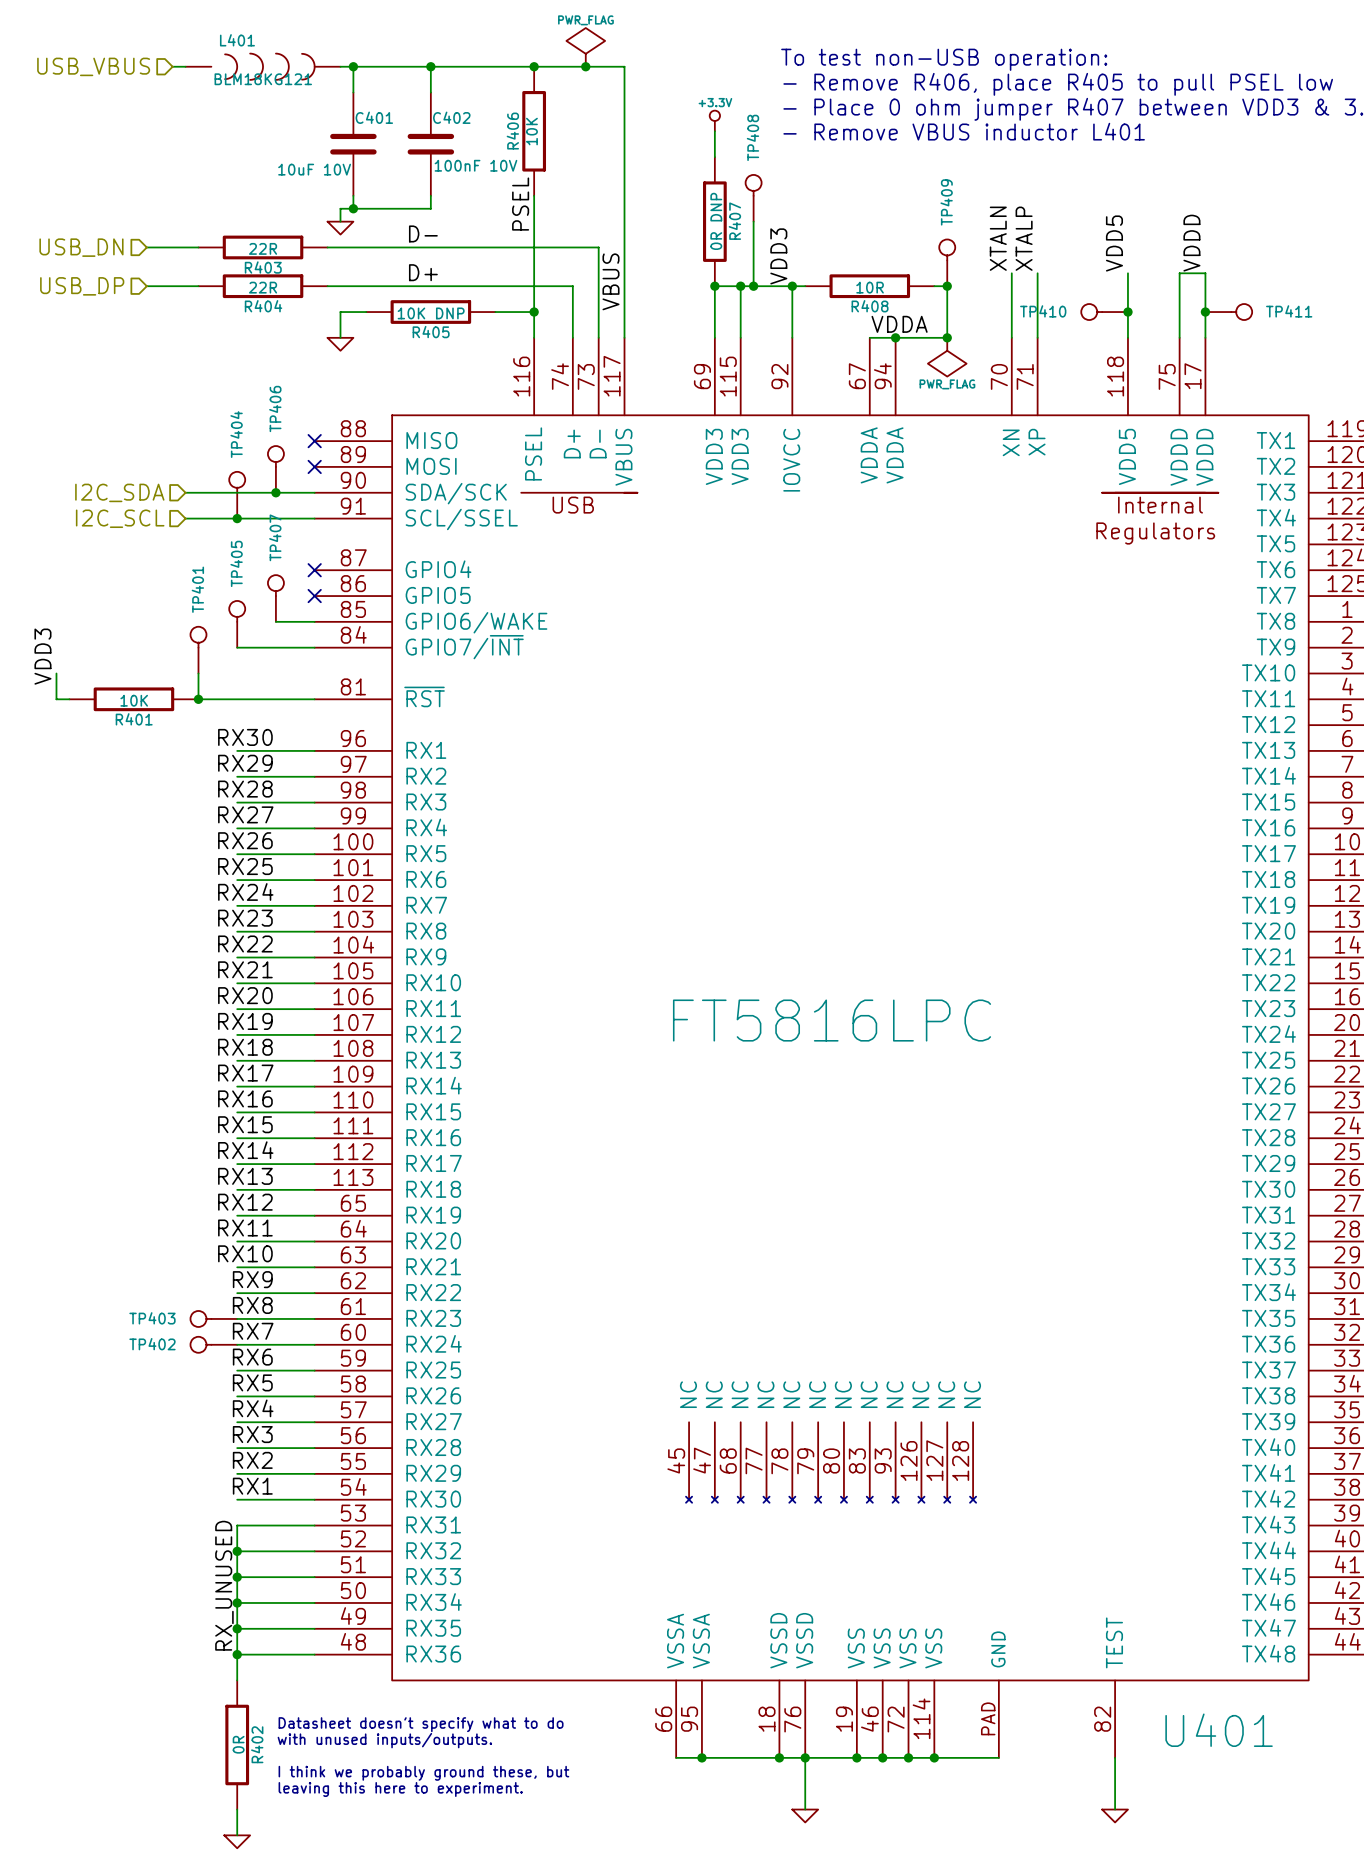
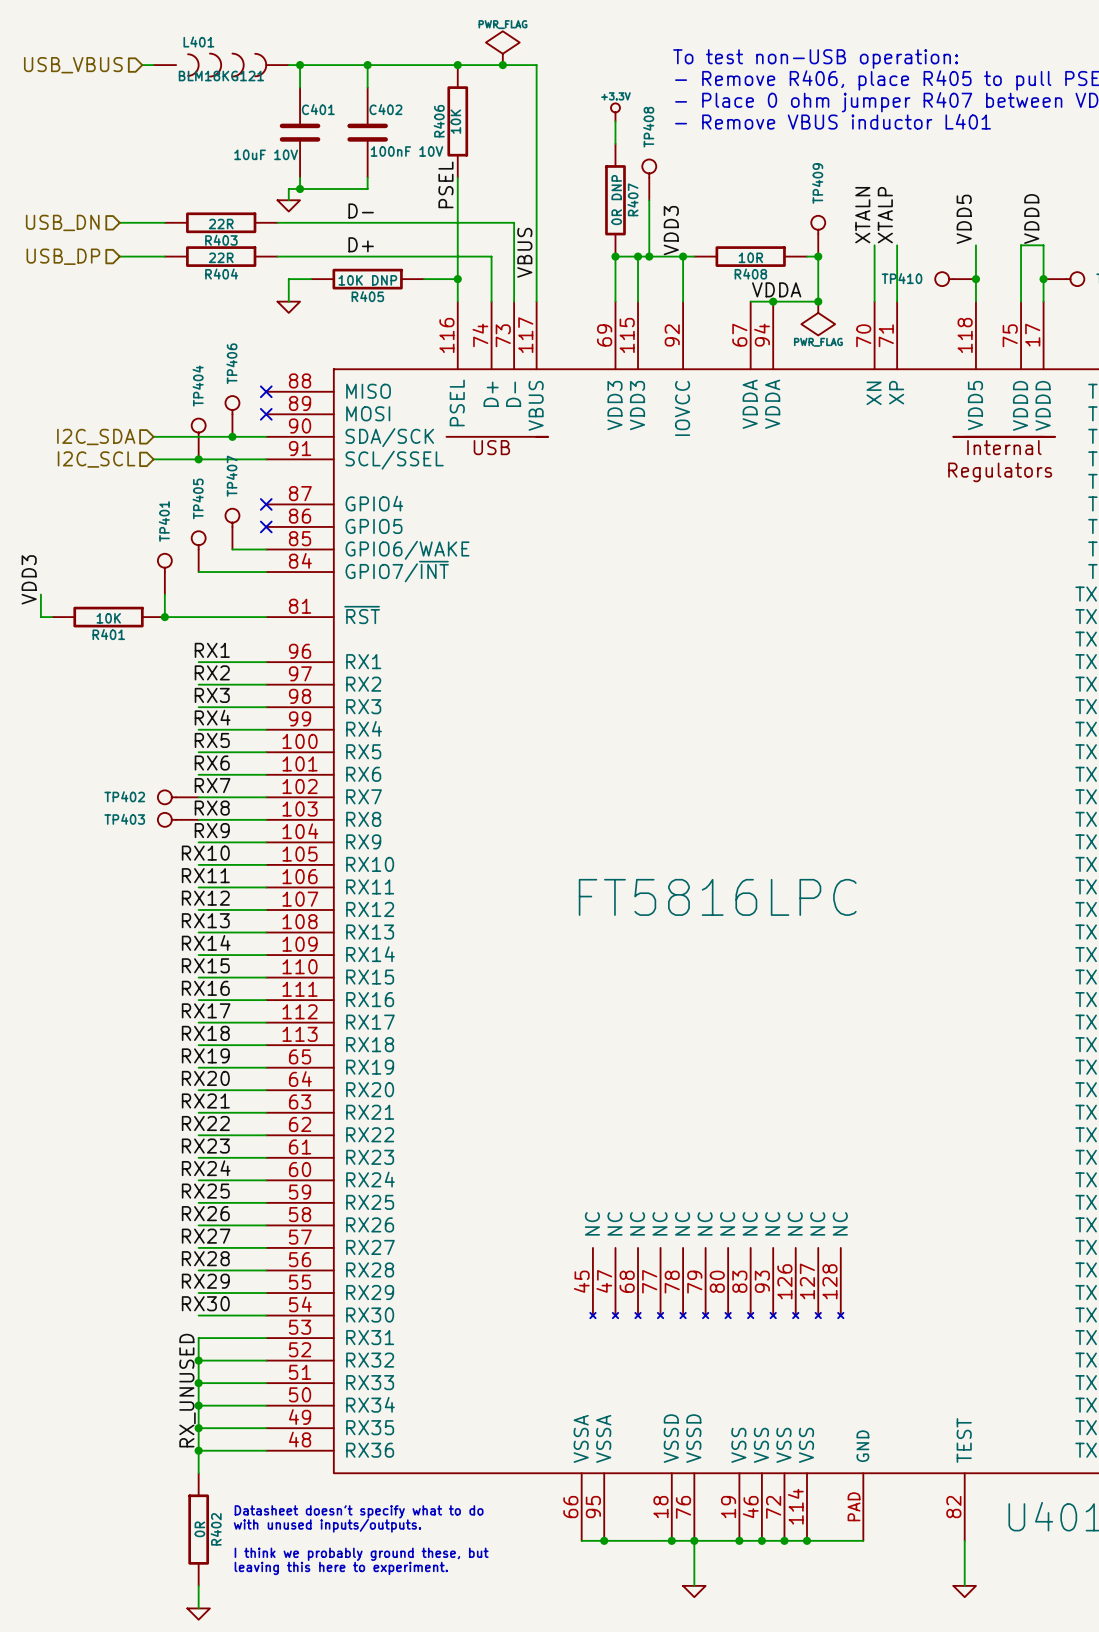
label: RX30 (245, 737) -> RX1 (212, 650)
label: RX29 (245, 763) -> RX2 (212, 672)
label: RX28 (245, 789) -> RX3 (212, 695)
label: RX27 (245, 814) -> RX4 (212, 717)
label: RX26 (245, 840) -> RX5 (212, 740)
label: RX25 (245, 866) -> RX6 (212, 763)
label: RX24 (245, 891) -> RX7 (212, 785)
label: RX23 (245, 918) -> RX8 (212, 808)
label: RX22 (245, 943) -> RX9 (212, 830)
label: RX21 (245, 969) -> RX10 (205, 853)
label: RX20 (245, 995) -> RX11 (205, 875)
label: RX19 (245, 1021) -> RX12 (205, 898)
label: RX18 (245, 1047) -> RX13 (205, 920)
label: RX17 (245, 1073) -> RX14 (206, 942)
label: RX16 (245, 1098) -> RX15 (205, 965)
label: RX15 (245, 1124) -> RX16 (205, 988)
label: RX14 (245, 1150) -> RX17 (206, 1010)
label: RX13 (245, 1176) -> RX18 (205, 1033)
label: RX12 (245, 1202) -> RX19 (205, 1055)
label: RX11 (245, 1228) -> RX20 (205, 1078)
label: RX10 (245, 1253) -> RX21 (205, 1100)
label: RX9 (252, 1279) -> RX22 (205, 1123)
label: RX8 (252, 1305) -> RX23 (205, 1146)
TP403 position: (213, 1318) -> (178, 819)
label: RX7 (253, 1331) -> RX24 (206, 1168)
TP402 position: (213, 1344) -> (178, 797)
label: RX6 (252, 1357) -> RX25 (205, 1191)
label: RX5 (252, 1382) -> RX26 (205, 1213)
label: RX4 (253, 1408) -> RX27 (206, 1236)
label: RX3 (252, 1434) -> RX28 (205, 1258)
label: RX2 (252, 1460) -> RX29 (205, 1281)
label: RX1 (252, 1486) -> RX30 (205, 1303)

